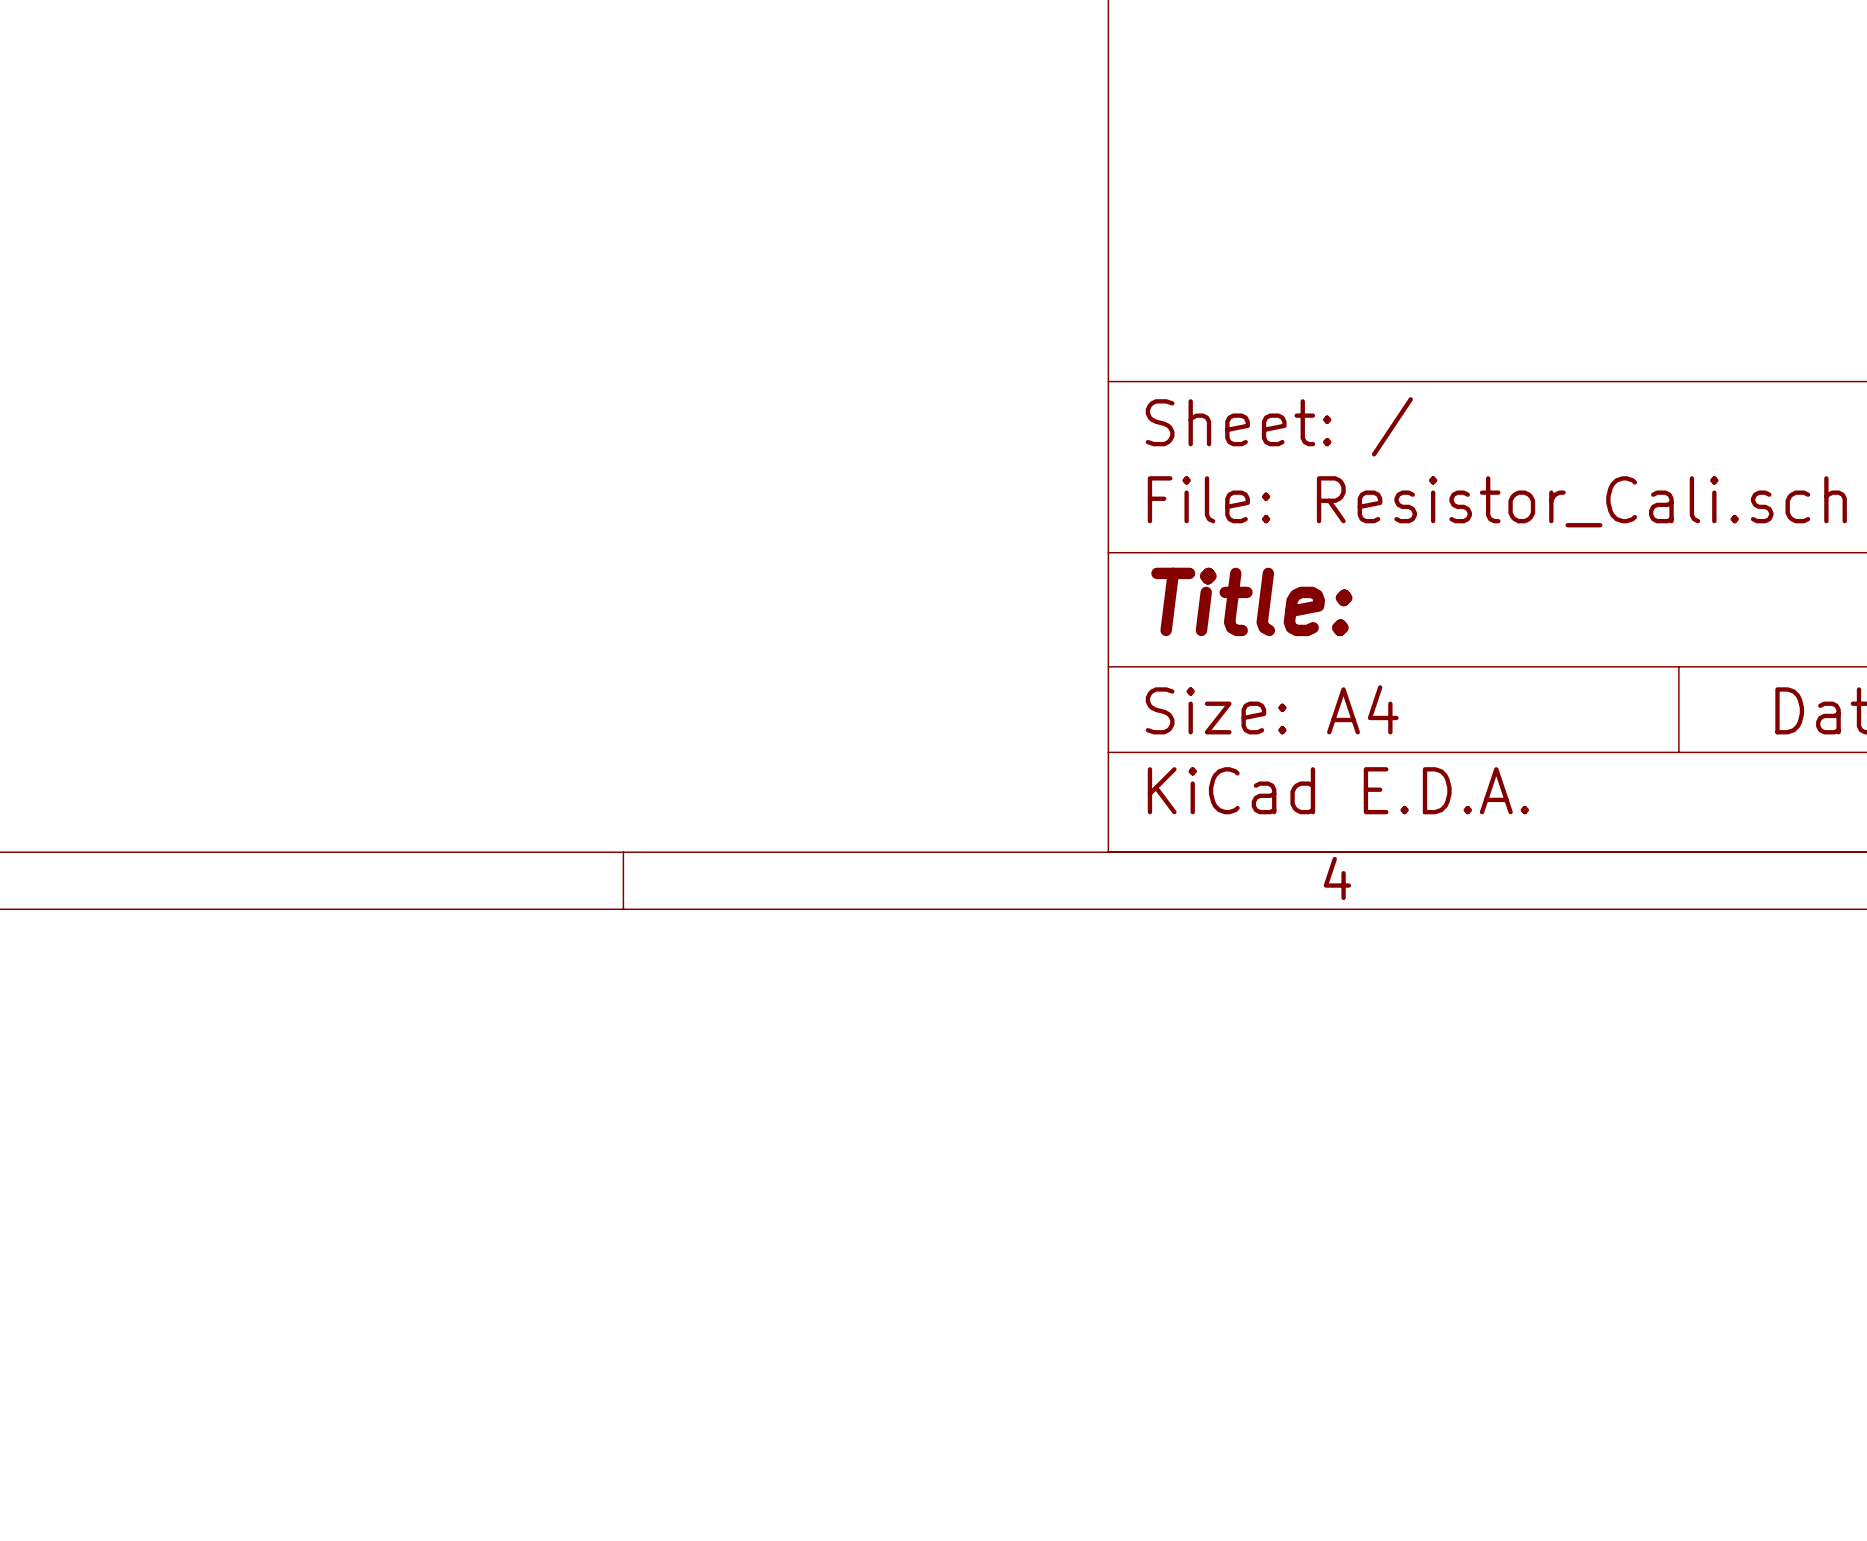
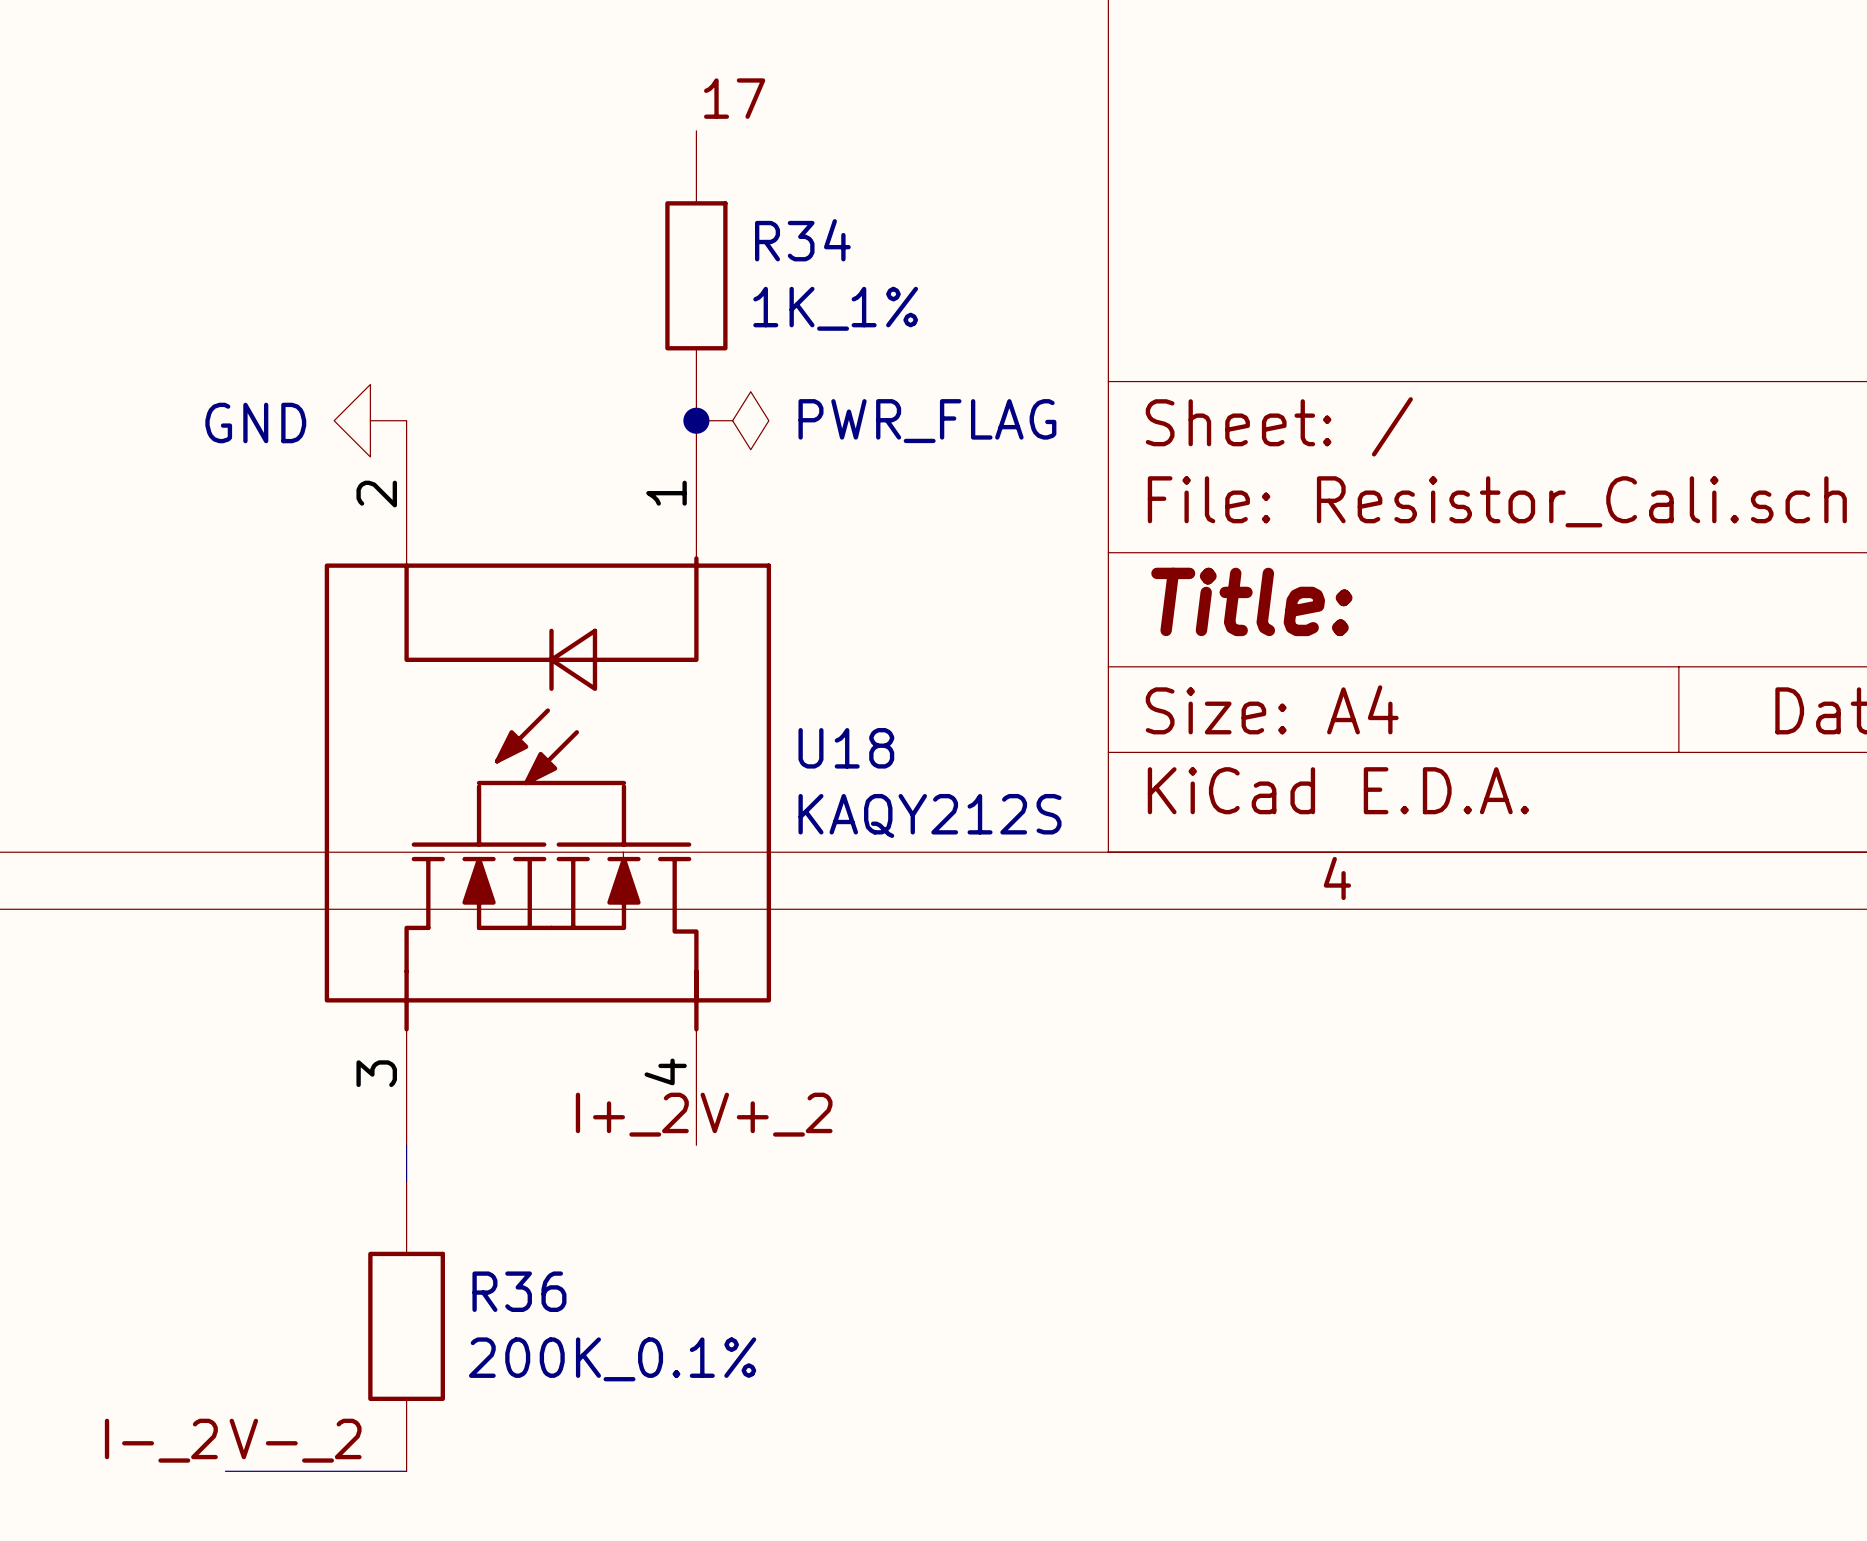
label: none -> 17 (734, 98)
R34: none -> 1K_1% (696, 275)
power symbol: none -> GND (370, 420)
junction: none -> (696, 420)
power symbol: none -> PWR_FLAG (732, 420)
U18: none -> KAQY212S (547, 782)
label: none -> I+_2 (632, 1114)
label: none -> V+_2 (766, 1114)
wire: none -> (406, 1145) (406, 1181)
R36: none -> 200K_0.1% (406, 1326)
label: none -> I-_2 (161, 1440)
label: none -> V-_2 (295, 1440)
wire: none -> (225, 1471) (406, 1471)

